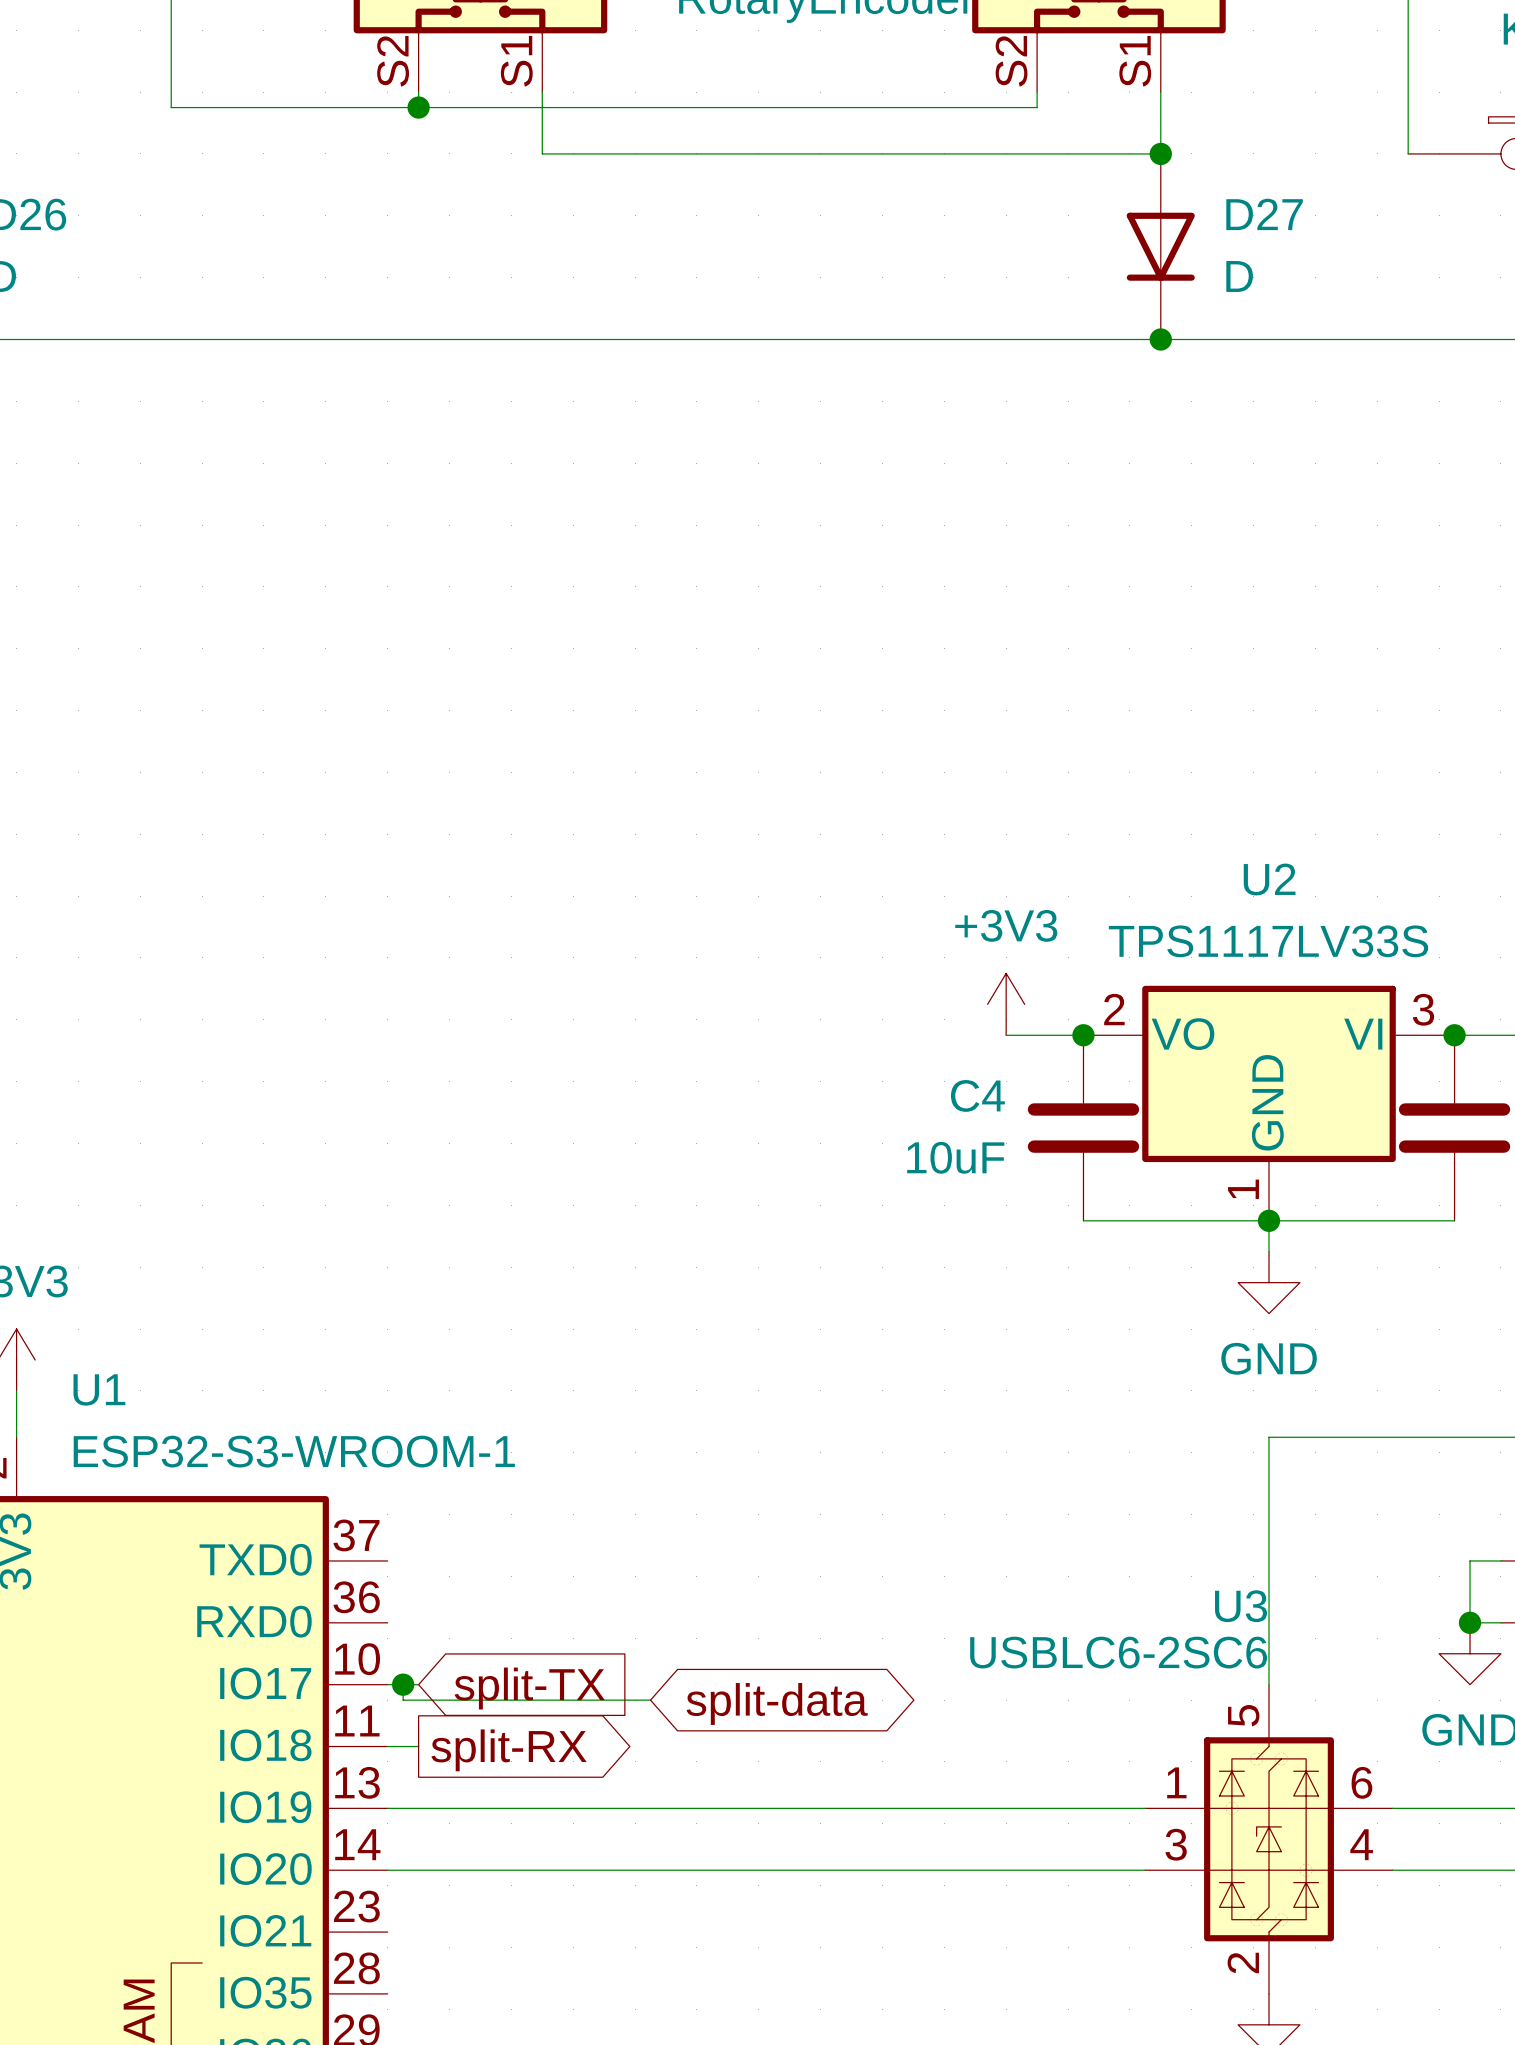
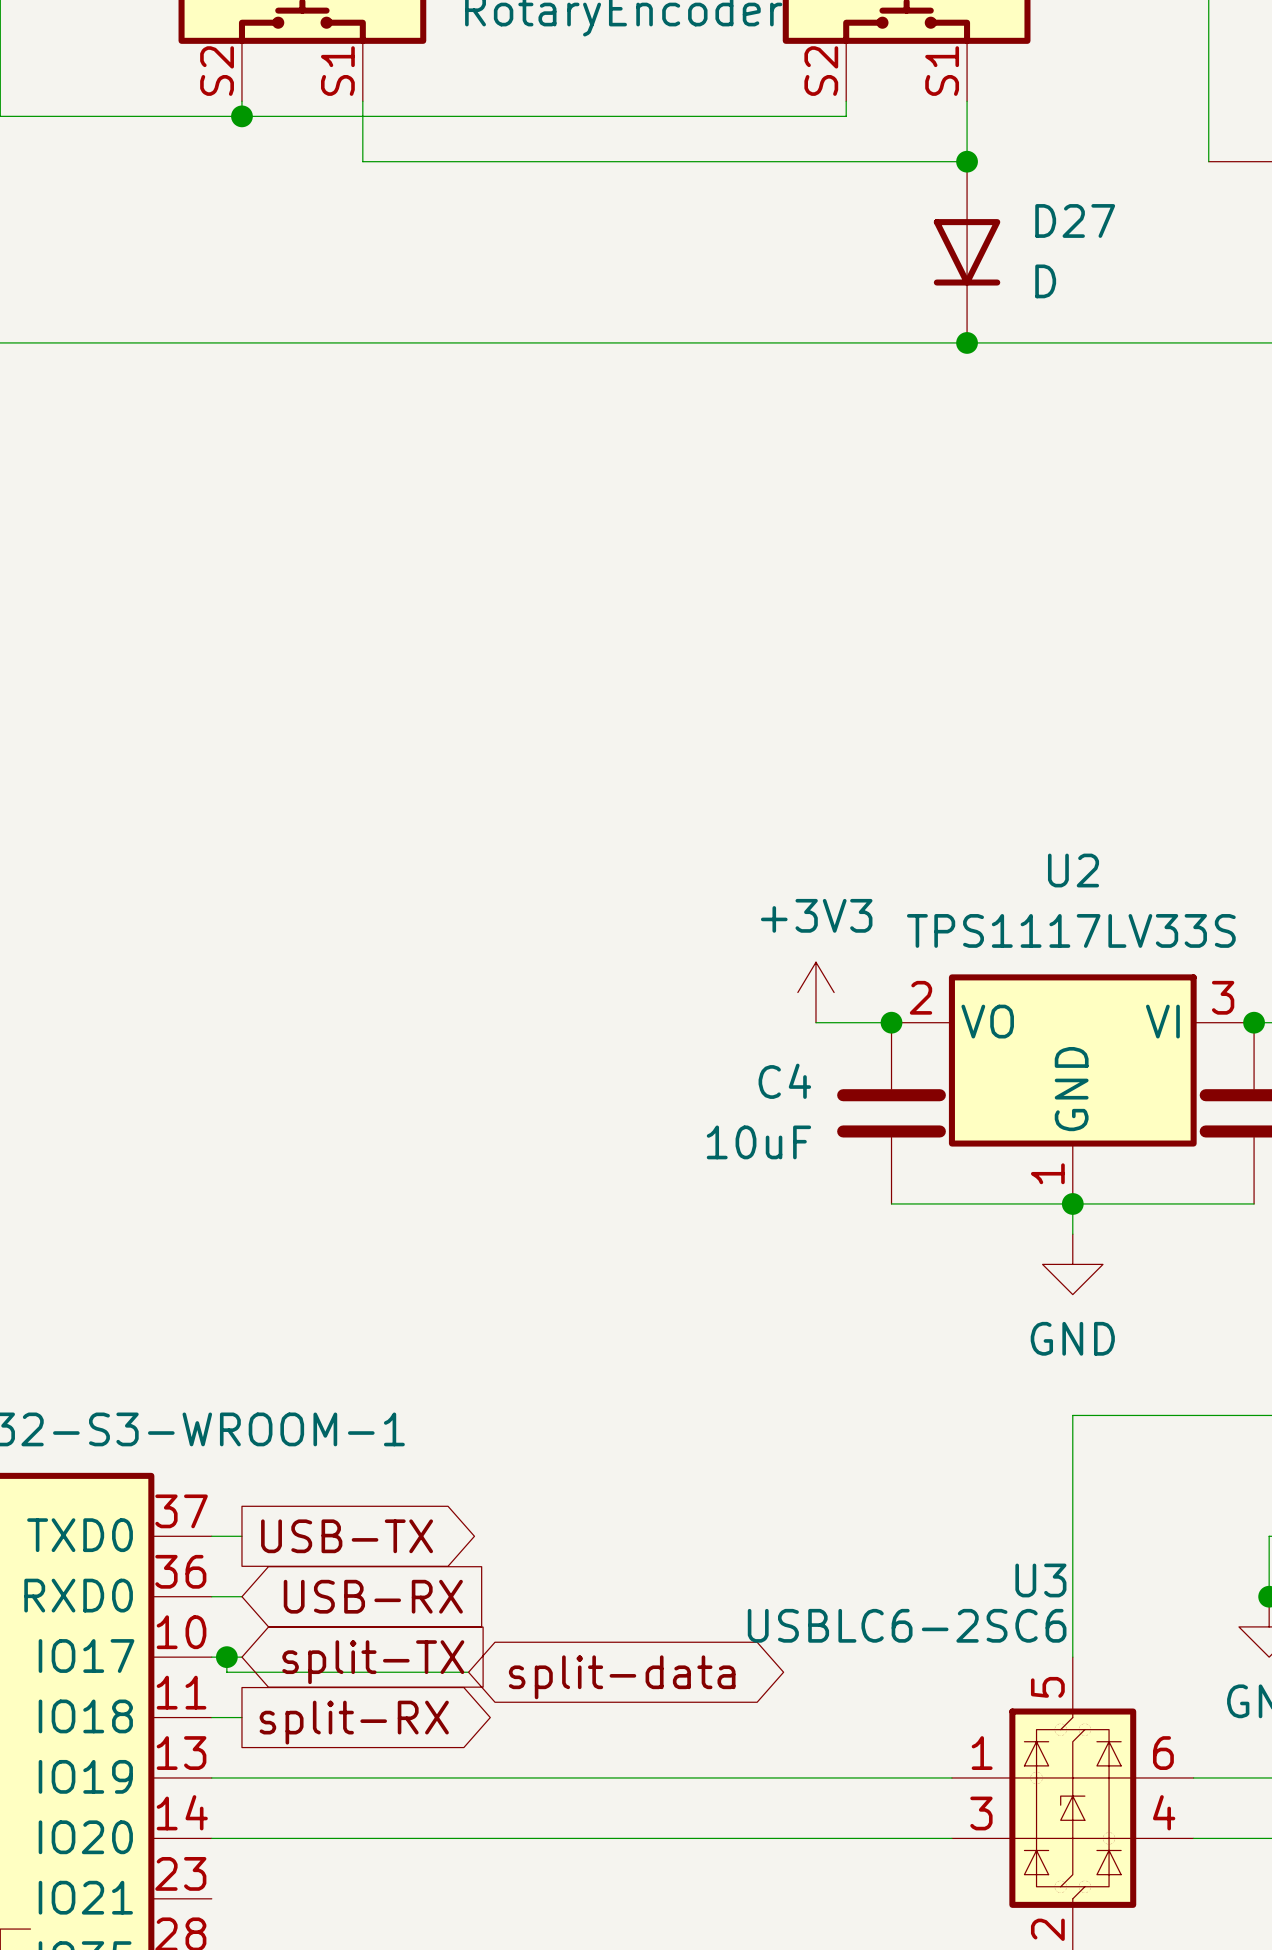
wire: none -> (211, 1536) (241, 1536)
global label: none -> USB-TX (347, 1536)
wire: none -> (211, 1596) (241, 1596)
global label: none -> USB-RX (373, 1596)

